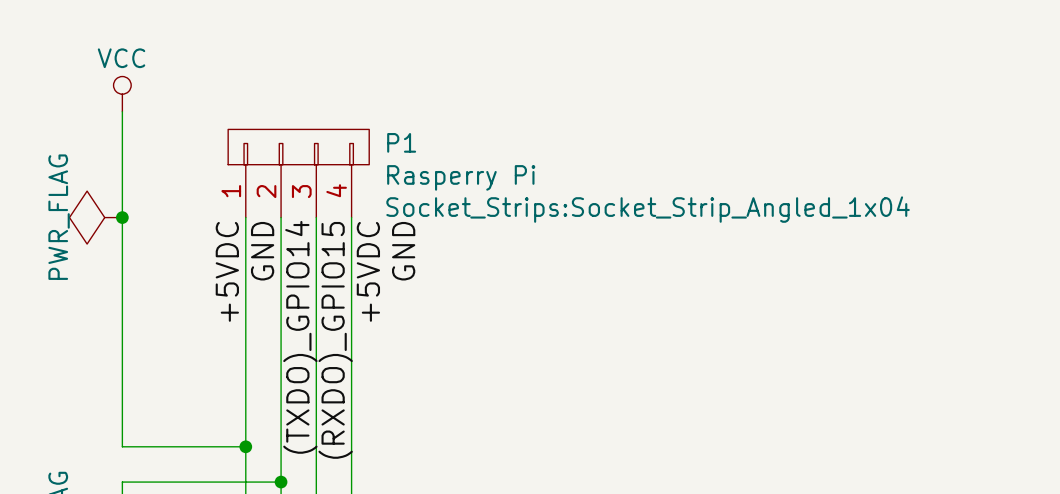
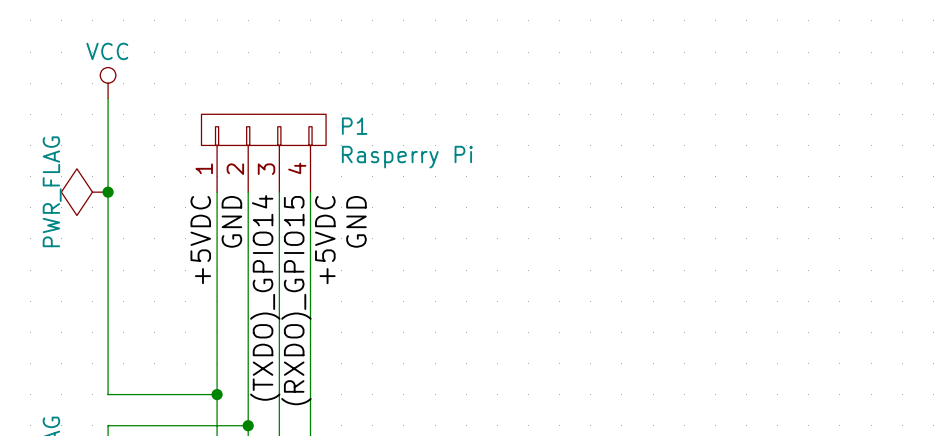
P1 text: Socket_Strips:Socket_Strip_Angled_1x04 (648, 209) -> none

